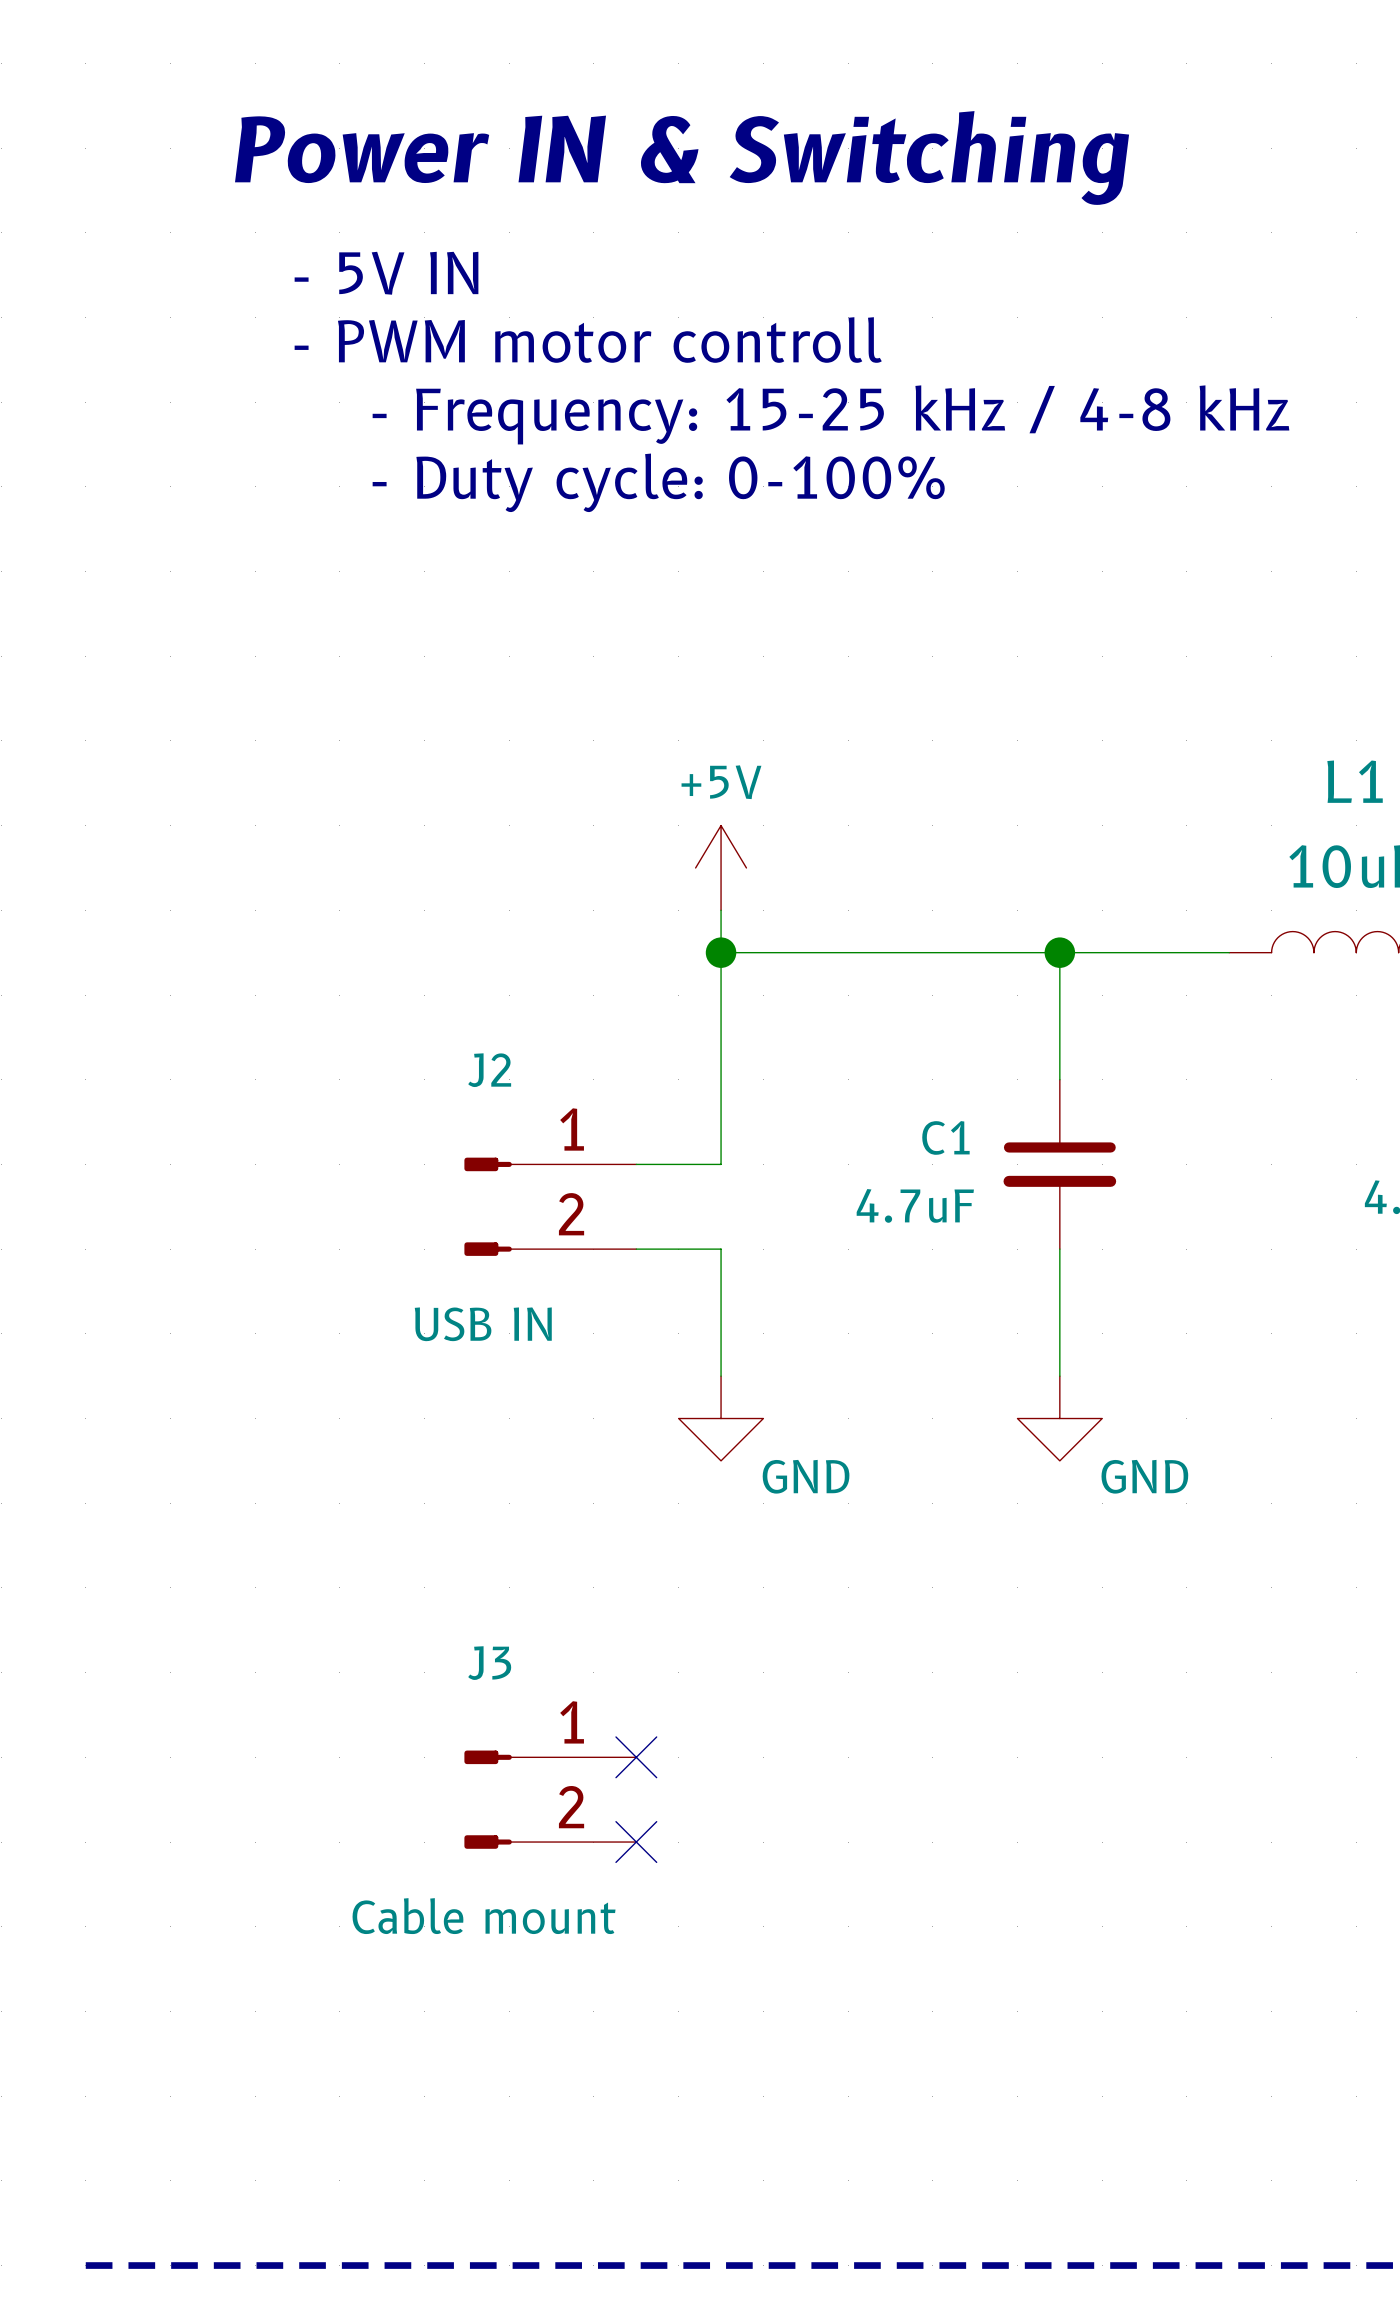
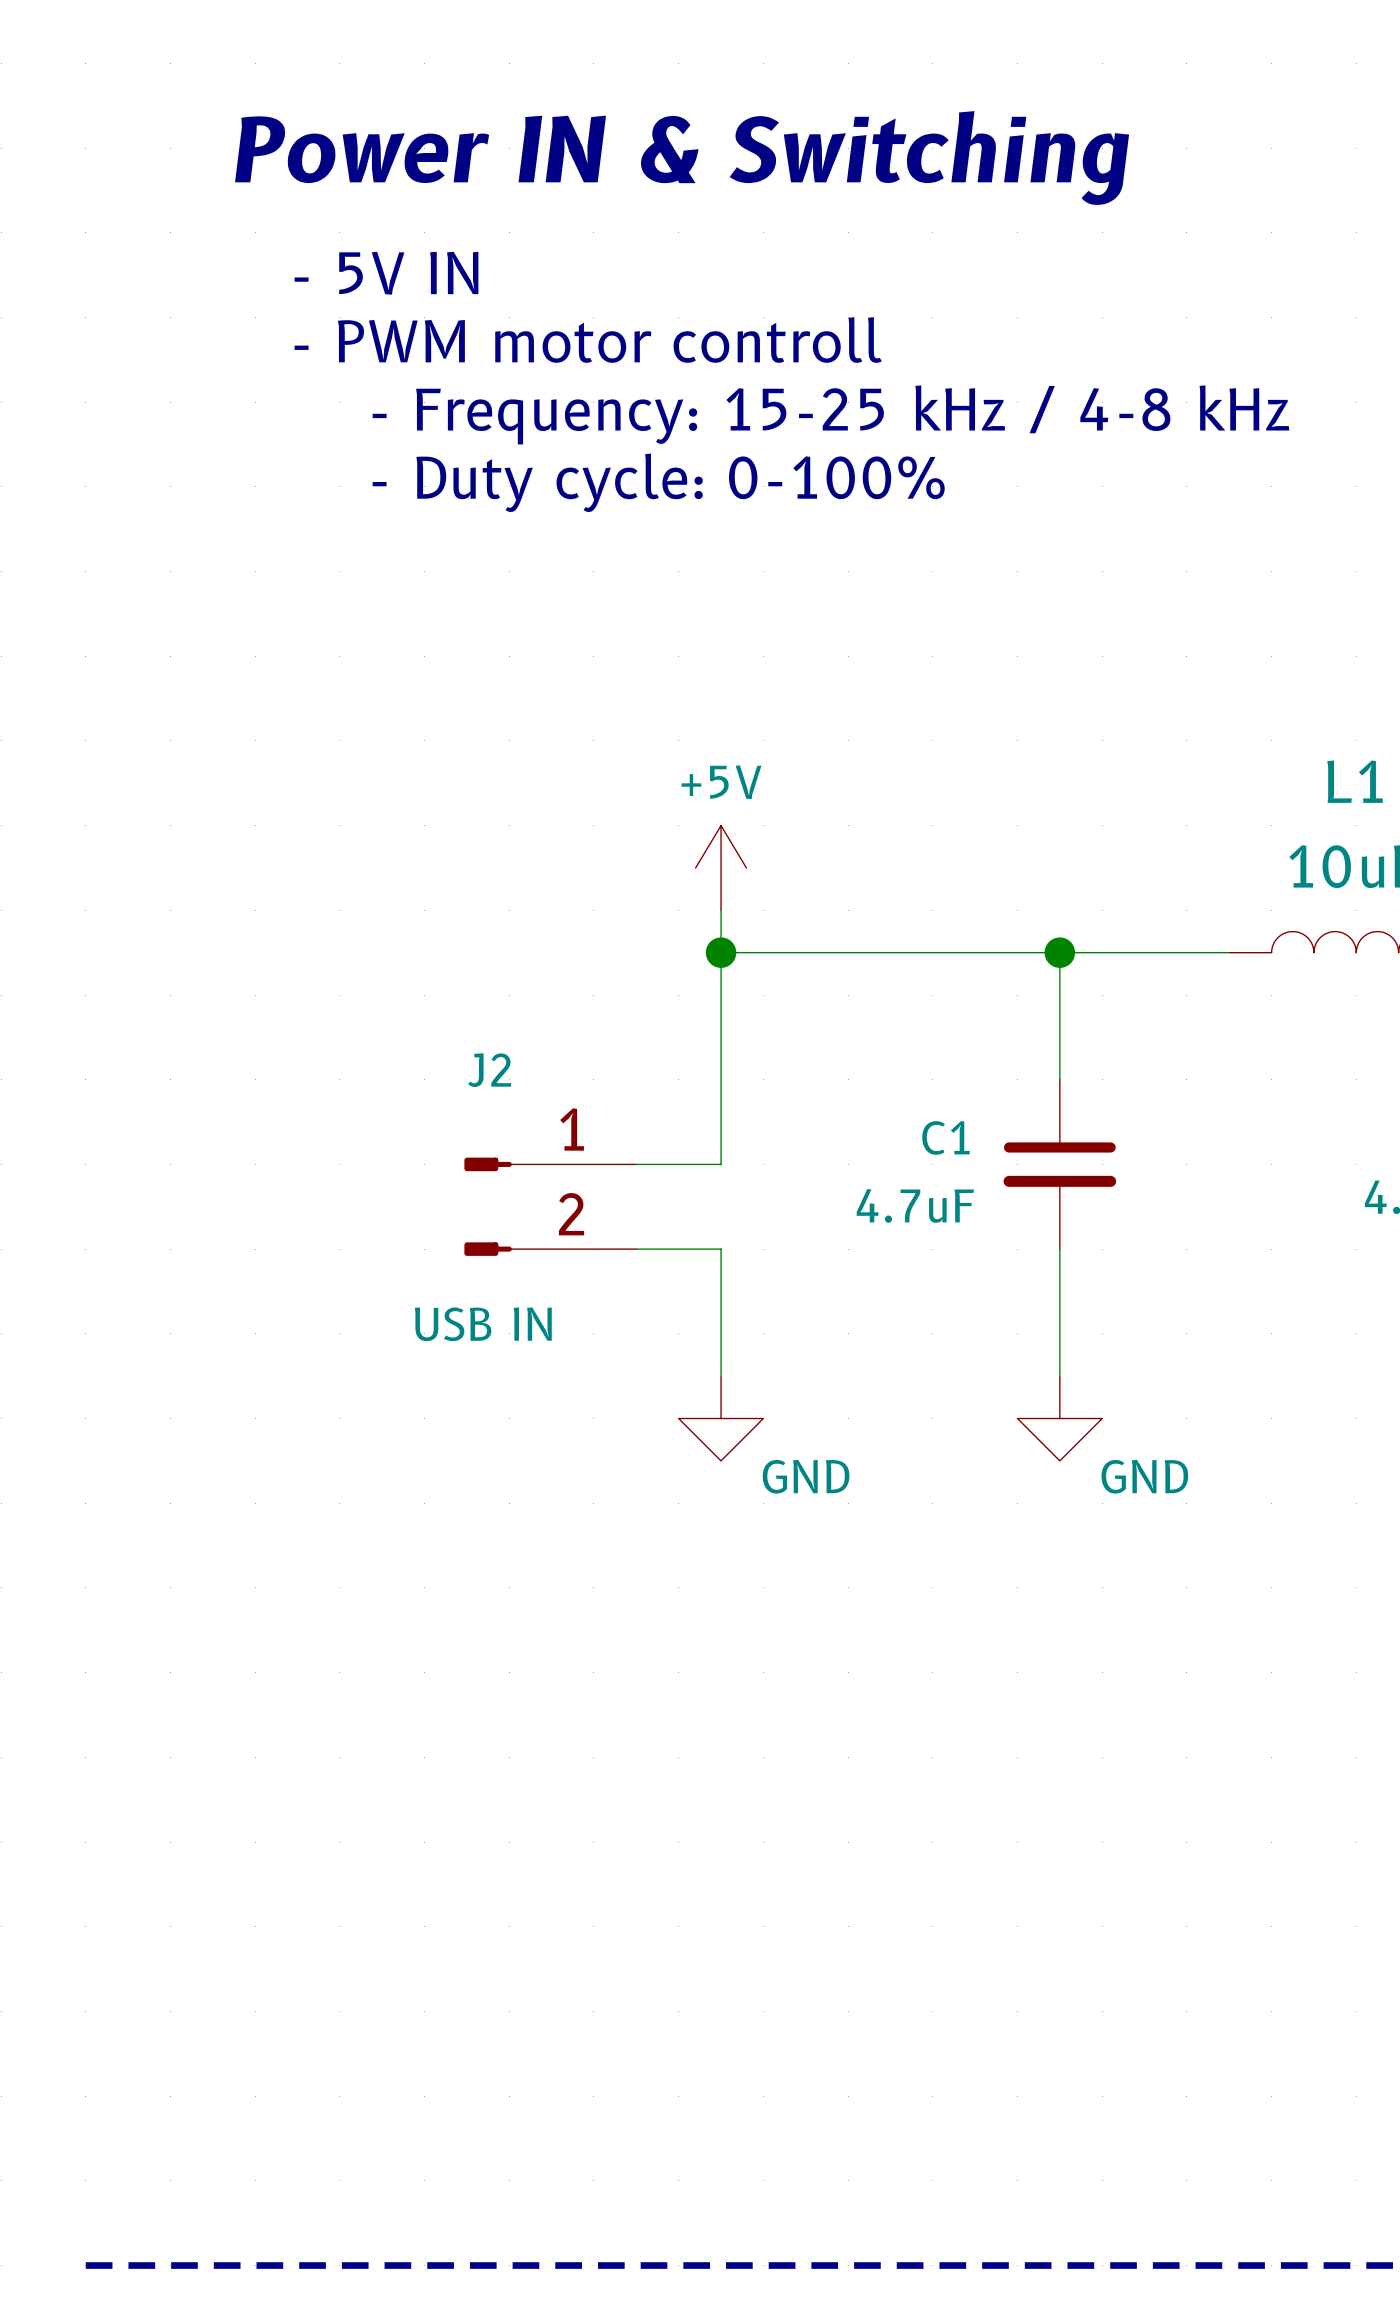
no-connect mark: (636, 1757) -> none
J3: Cable mount (550, 1799) -> none
no-connect mark: (636, 1842) -> none

